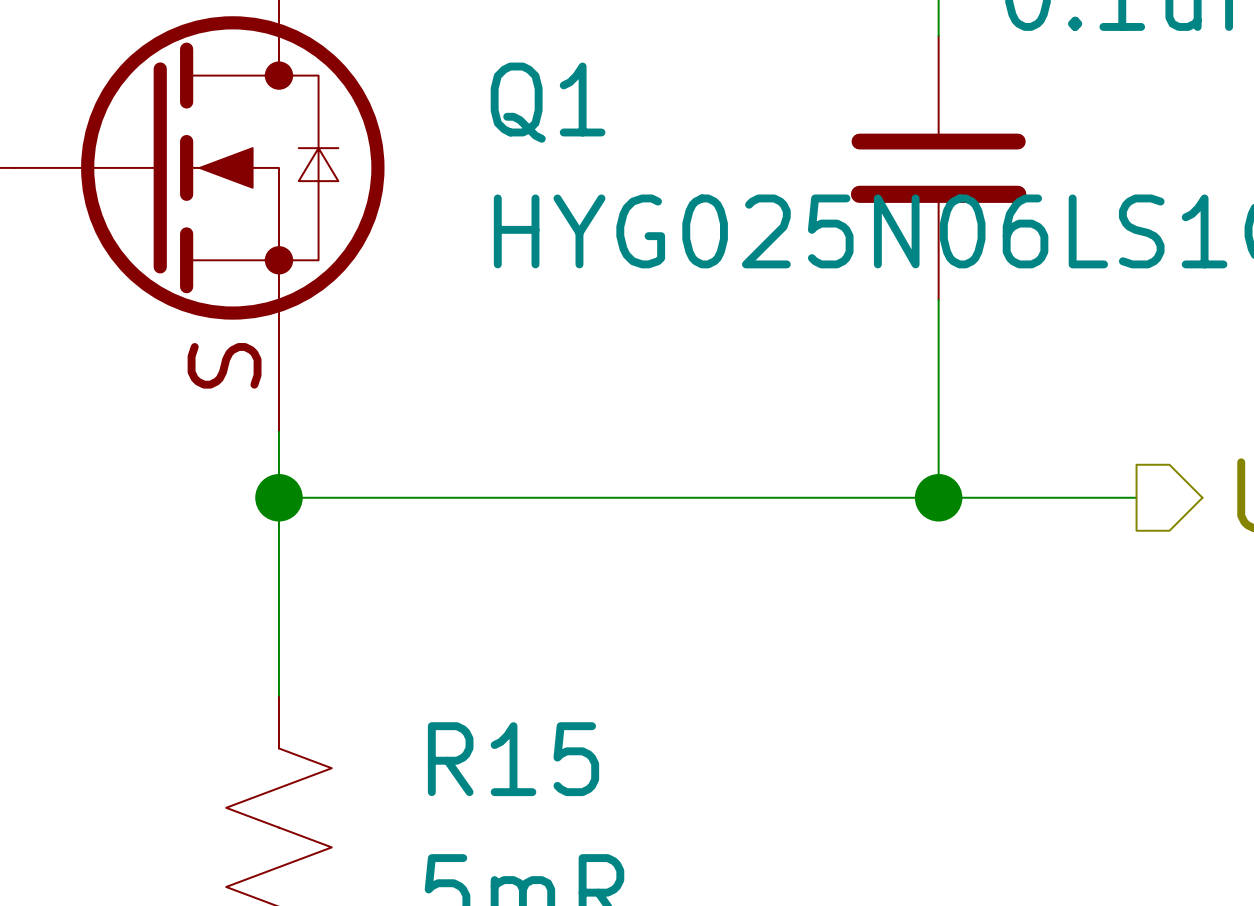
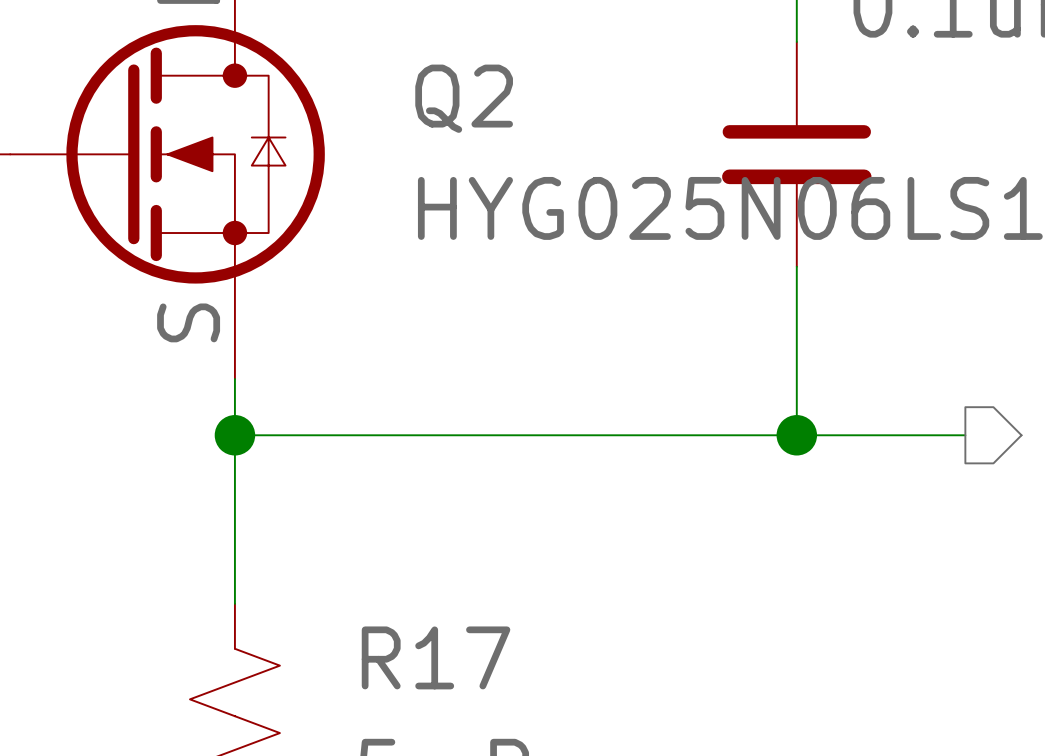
Q1 name: Q1 (548, 102) -> Q2 (464, 98)
R15 name: R15 (513, 759) -> R17 (436, 657)

